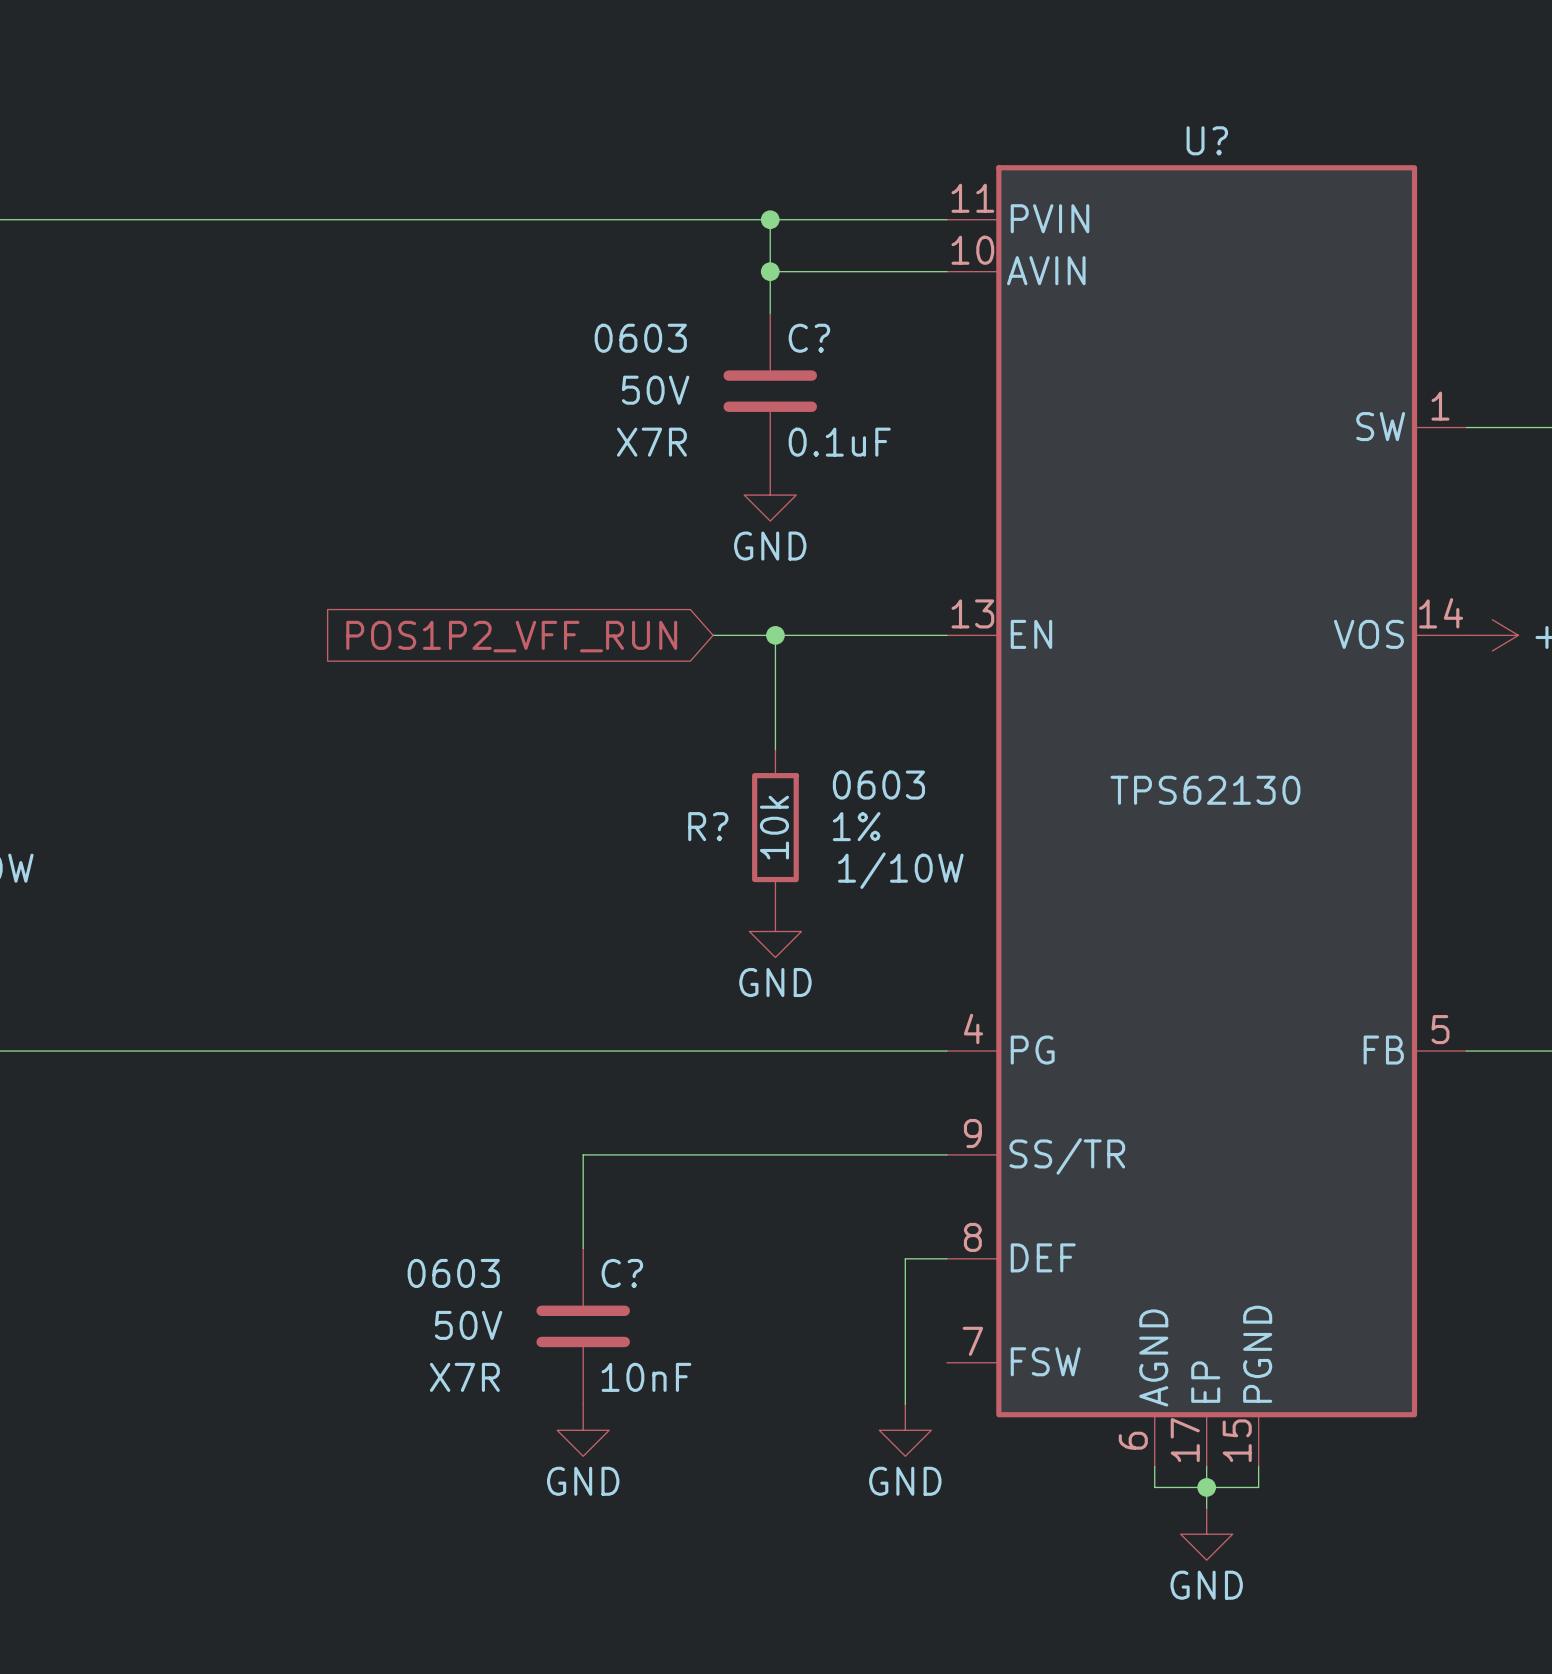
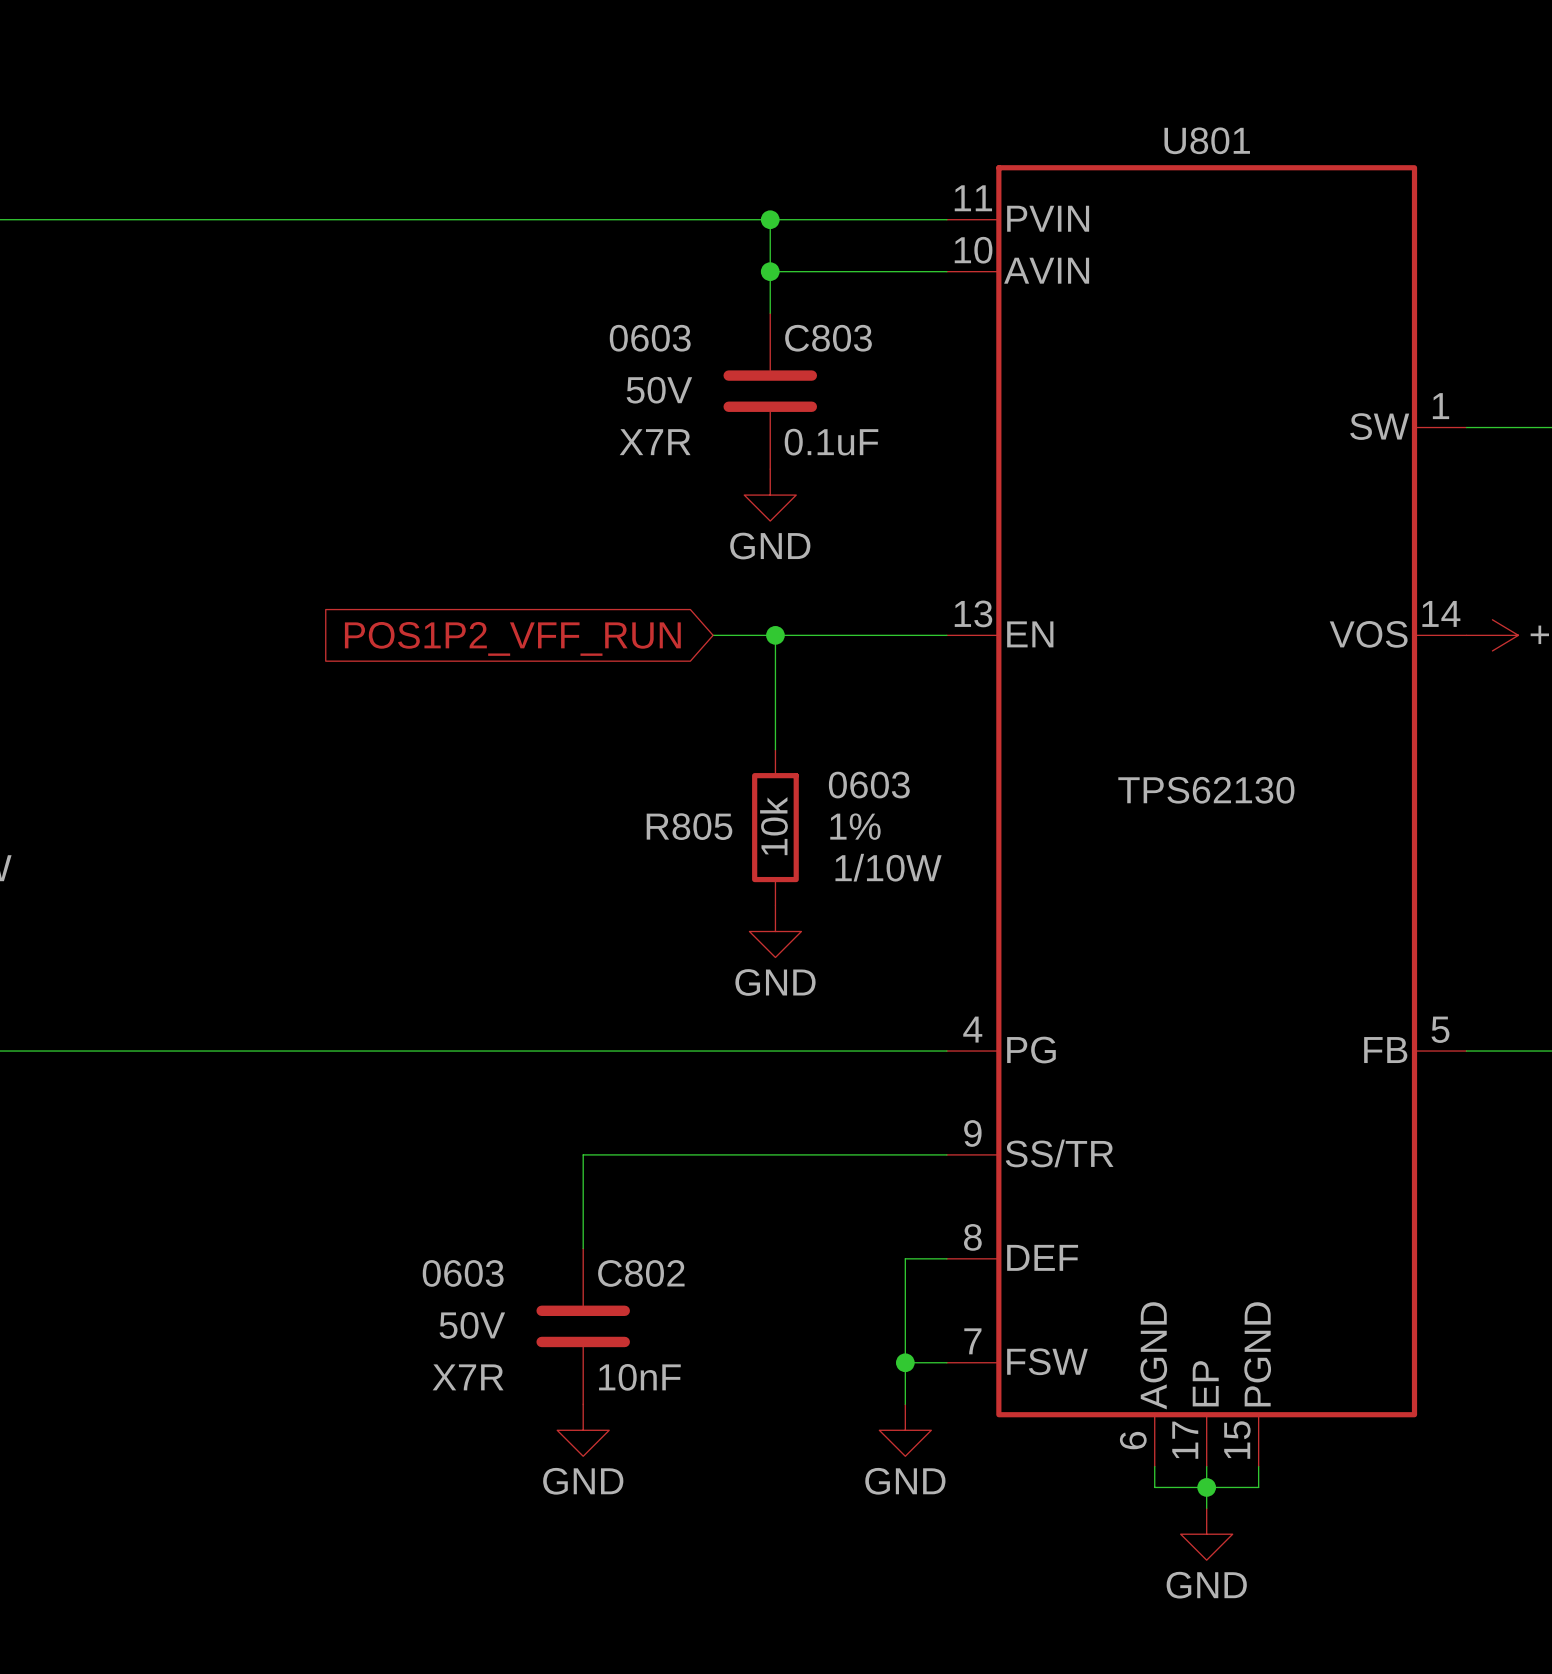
U? name: U? (1207, 140) -> U801 (1207, 140)
C? name: C? (809, 338) -> C803 (828, 338)
R? name: R? (708, 826) -> R805 (689, 826)
C? name: C? (622, 1273) -> C802 (641, 1273)
wire: none -> (905, 1362) (946, 1362)
junction: none -> (905, 1362)

